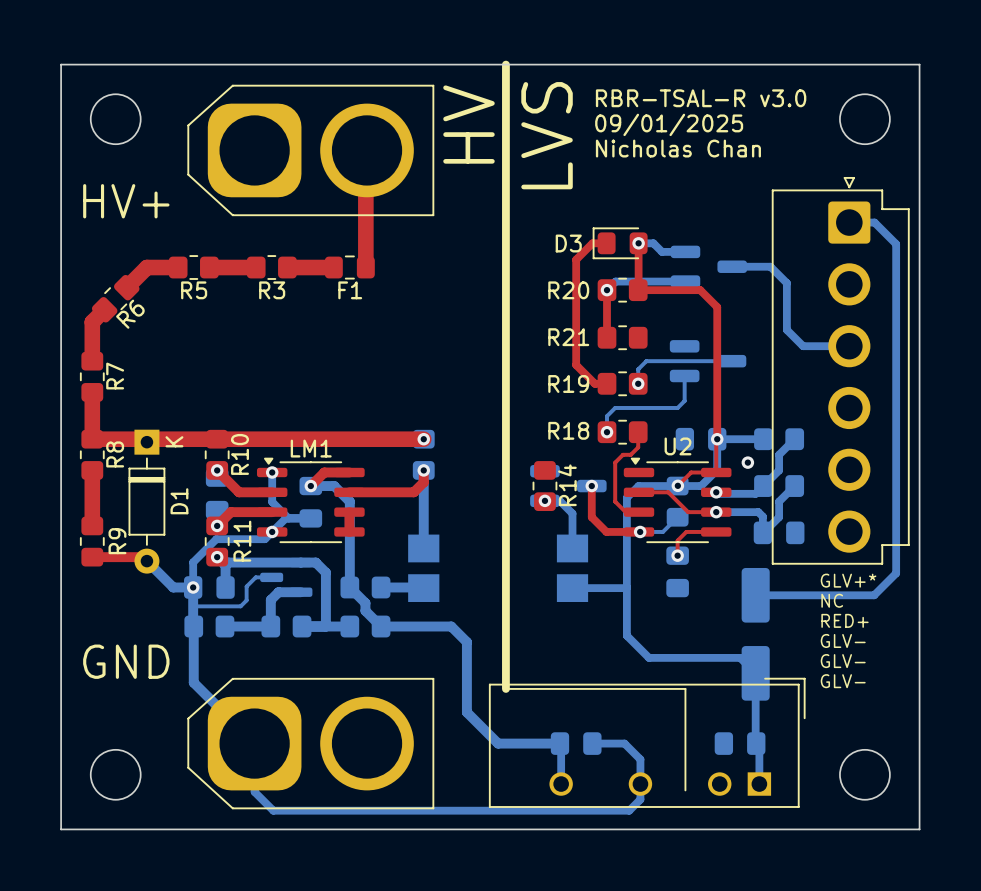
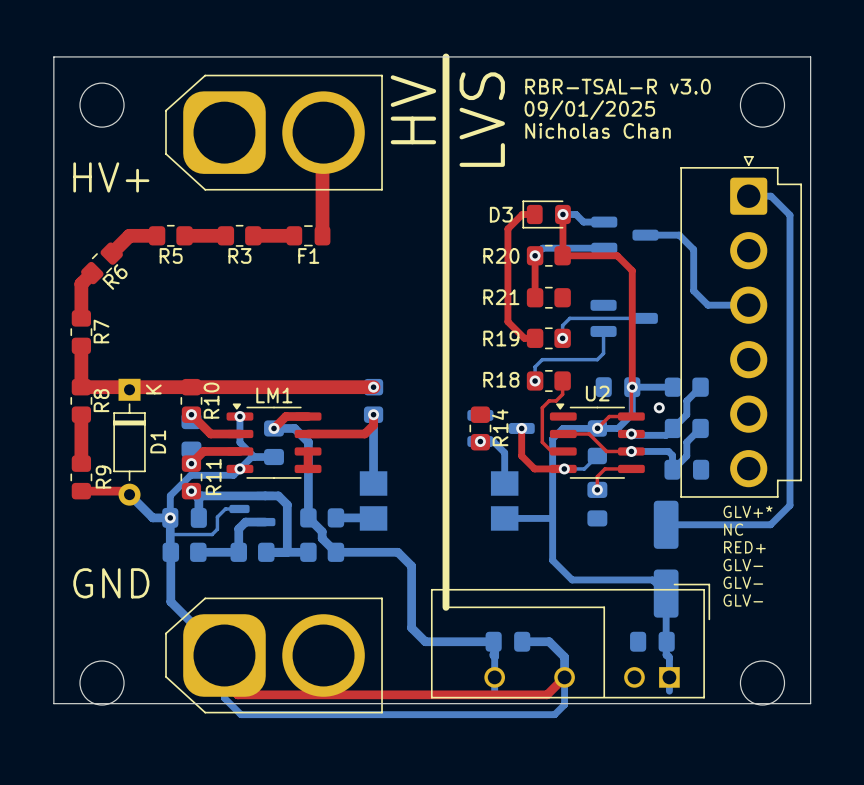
top track: none -> (224, 627) (224, 681) (237, 694) (547, 694) (564, 677)
bottom track: (482, 727) (498, 743) (561, 744) -> (425, 641) (493, 641) (494, 656)
part position: (647, 742) -> (570, 641)
part position: (576, 743) -> (507, 641)
bottom track: (592, 743) (624, 743) (640, 759) -> (522, 641) (549, 641) (564, 657) (564, 669)
part position: (740, 743) -> (652, 641)
board edge: (61, 798) (61, 829) (919, 829) (919, 798) -> (53, 703) (810, 703)

